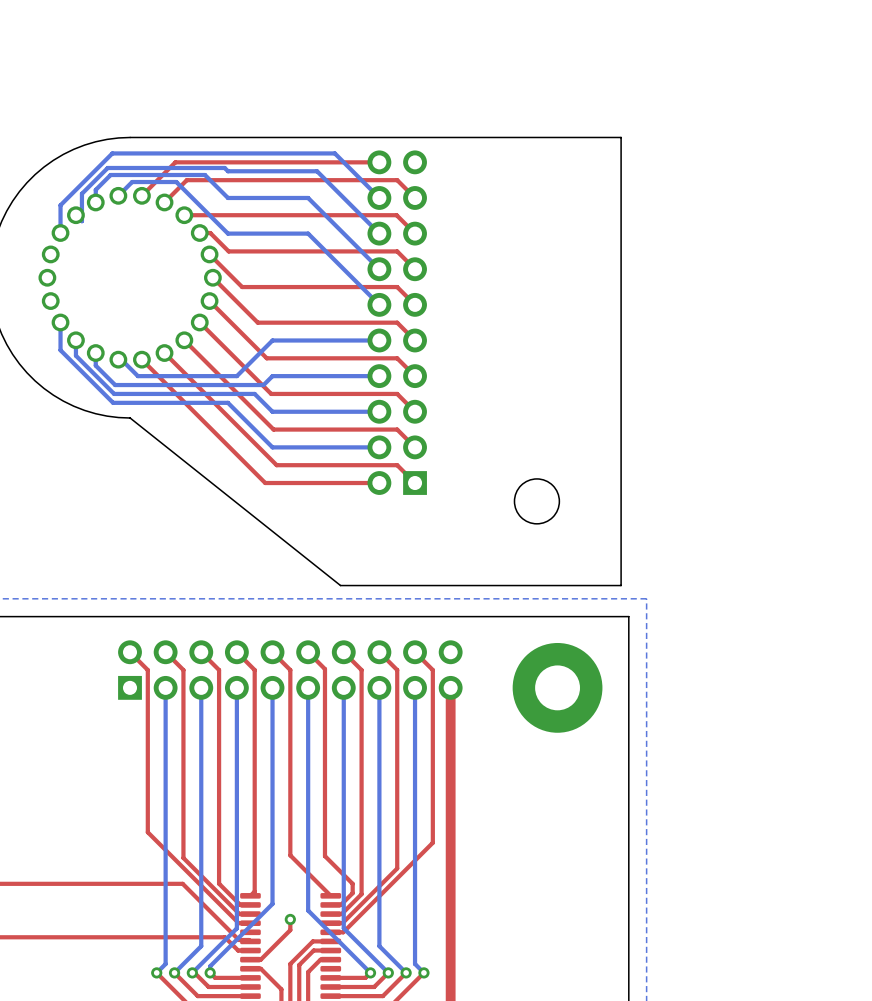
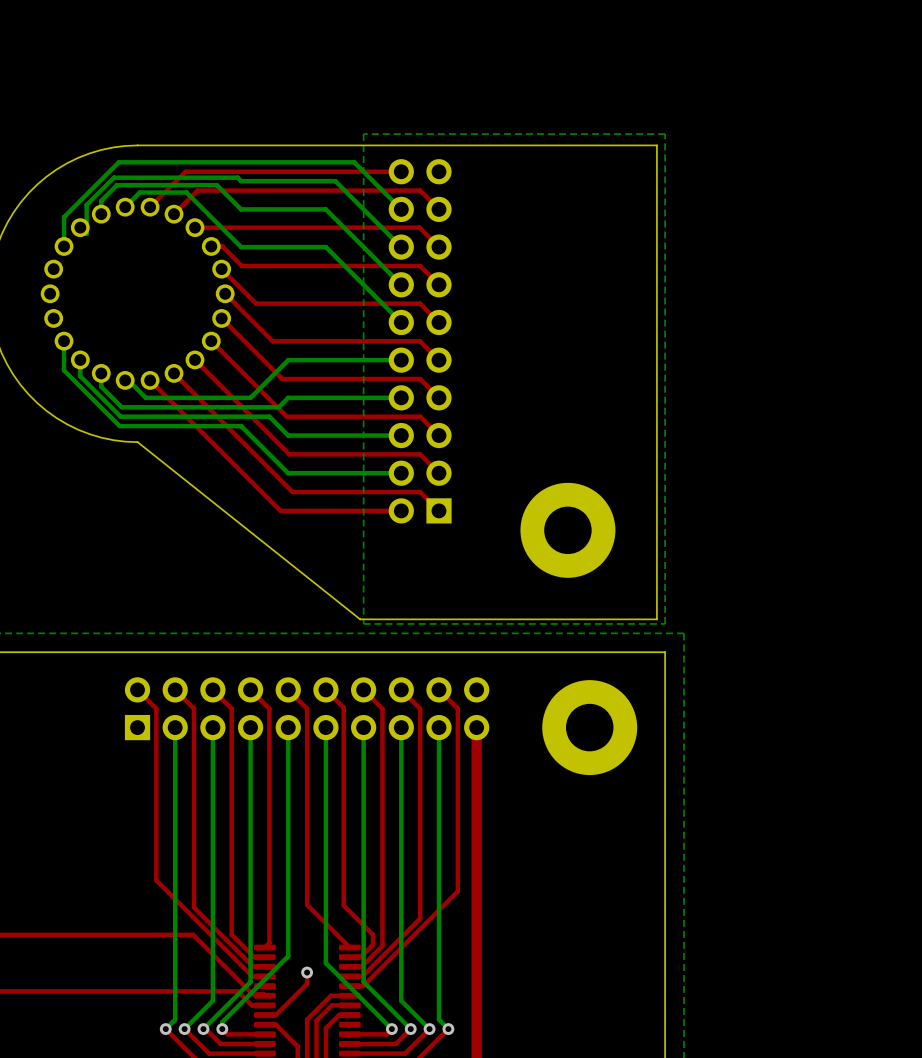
bottom zone outline: none -> (665, 134) (665, 623) (363, 623) (363, 134) (665, 134)
round board edge: [514, 478, 560, 525] -> none
part: none -> (567, 530)

